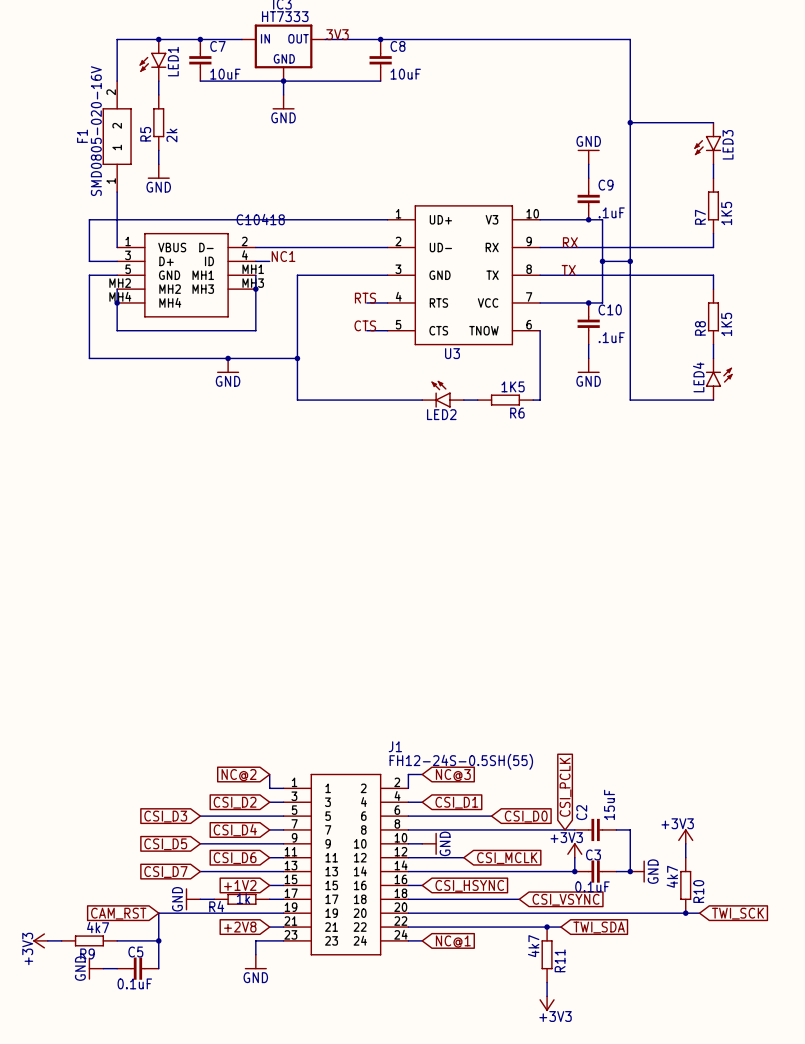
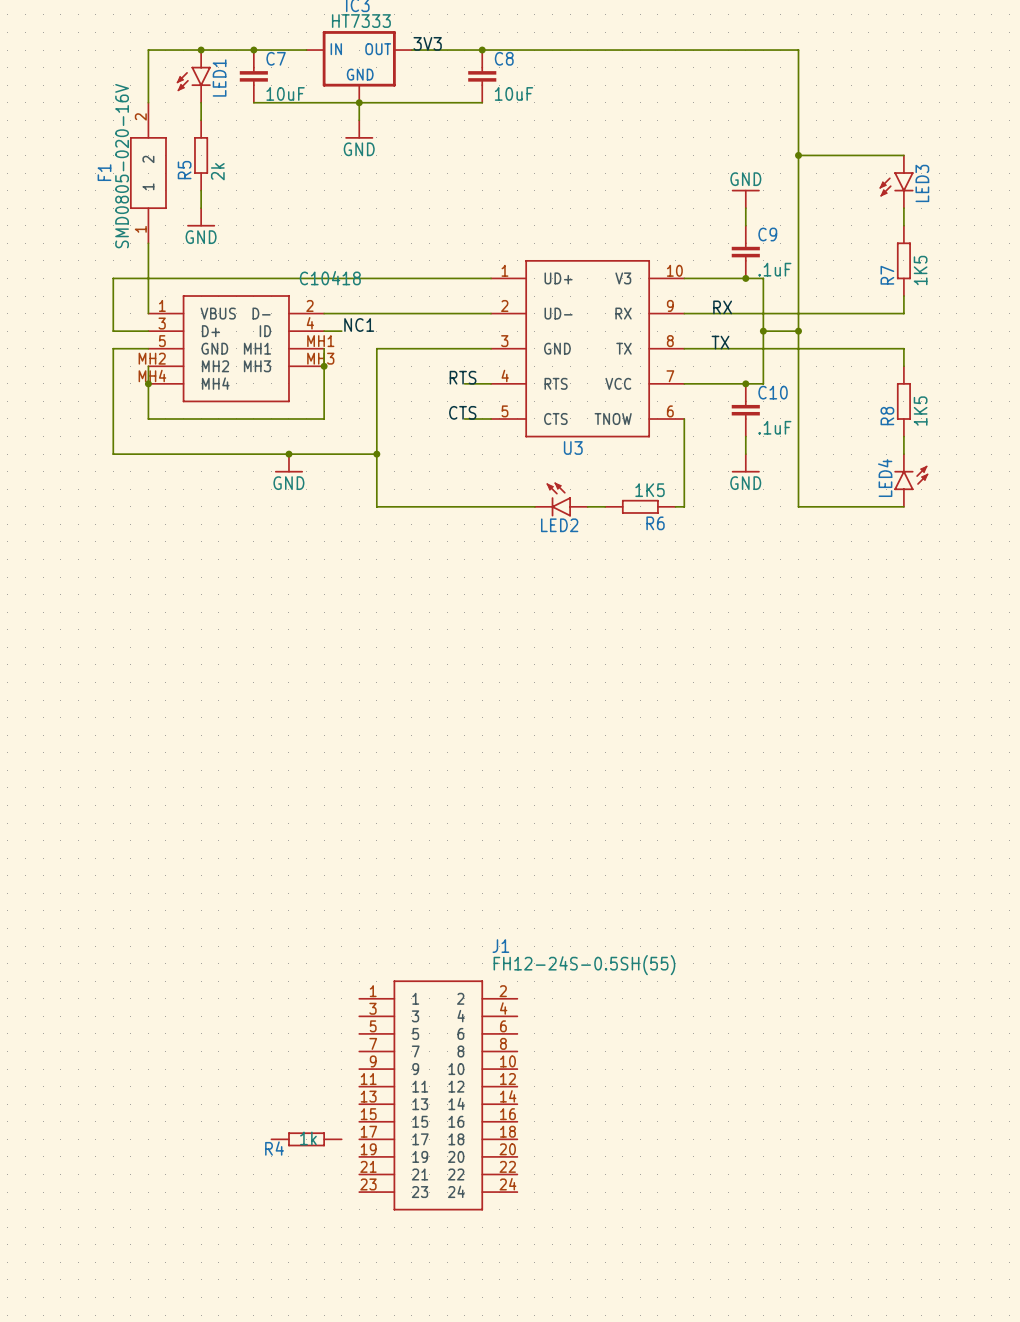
wire: (269, 774) (269, 788) (283, 788) -> none
wire: (422, 774) (408, 774) (408, 788) -> none
global label: NC@2 (239, 775) -> none
global label: NC@3 (453, 775) -> none
global label: CSI_PCLK (565, 787) -> none
global label: CSI_D2 (235, 802) -> none
wire: (269, 802) (283, 802) -> none
wire: (408, 802) (422, 802) -> none
global label: CSI_D1 (456, 802) -> none
global label: CSI_D3 (165, 816) -> none
wire: (200, 816) (283, 816) -> none
wire: (408, 816) (491, 816) -> none
global label: CSI_D0 (526, 816) -> none
wire: (269, 829) (283, 829) -> none
wire: (408, 829) (574, 829) -> none
C2: 15uF (595, 829) -> none
wire: (616, 829) (630, 829) (630, 871) (616, 871) -> none
global label: CSI_D4 (235, 830) -> none
power symbol: +3V3 (685, 836) -> none
wire: (200, 843) (283, 843) -> none
wire: (408, 843) (422, 843) -> none
power symbol: GND (429, 843) -> none
wire: (685, 843) (685, 857) -> none
global label: CSI_D5 (165, 844) -> none
power symbol: +3V3 (574, 850) -> none
wire: (269, 857) (283, 857) -> none
wire: (408, 857) (463, 857) -> none
wire: (574, 857) (574, 871) (408, 871) -> none
global label: CSI_D6 (235, 858) -> none
global label: CSI_MCLK (507, 858) -> none
wire: (200, 871) (283, 871) -> none
junction: (574, 871) -> none
C3: 0.1uF (595, 871) -> none
junction: (630, 871) -> none
power symbol: GND (637, 871) -> none
global label: CSI_D7 (165, 872) -> none
global label: +1V2 (240, 885) -> none
wire: (269, 885) (283, 885) -> none
wire: (408, 885) (422, 885) -> none
global label: CSI_HSYNC (469, 885) -> none
R10: 4k7 (685, 885) -> none
power symbol: GND (193, 899) -> none
wire: (200, 899) (214, 899) -> none
wire: (269, 899) (283, 899) -> none
wire: (408, 899) (519, 899) -> none
global label: CSI_VSYNC (566, 899) -> none
global label: CAM_RST (118, 913) -> none
wire: (283, 913) (158, 913) (158, 968) -> none
wire: (408, 913) (699, 913) -> none
junction: (685, 913) -> none
global label: TWI_SCK (737, 913) -> none
global label: +2V8 (240, 927) -> none
wire: (269, 927) (283, 927) -> none
wire: (408, 927) (560, 927) -> none
junction: (547, 927) -> none
global label: TWI_SDA (599, 927) -> none
power symbol: +3V3 (40, 940) -> none
wire: (47, 940) (61, 940) -> none
R9: 4k7 (89, 940) -> none
wire: (117, 940) (158, 940) -> none
junction: (158, 940) -> none
wire: (283, 940) (255, 940) (255, 954) -> none
wire: (408, 940) (422, 940) -> none
global label: NC@1 (453, 941) -> none
R11: 4k7 (547, 954) -> none
power symbol: GND (255, 962) -> none
power symbol: GND (96, 968) -> none
wire: (103, 968) (117, 968) -> none
C5: 0.1uF (137, 968) -> none
wire: (547, 982) (547, 996) -> none
power symbol: +3V3 (547, 1003) -> none

